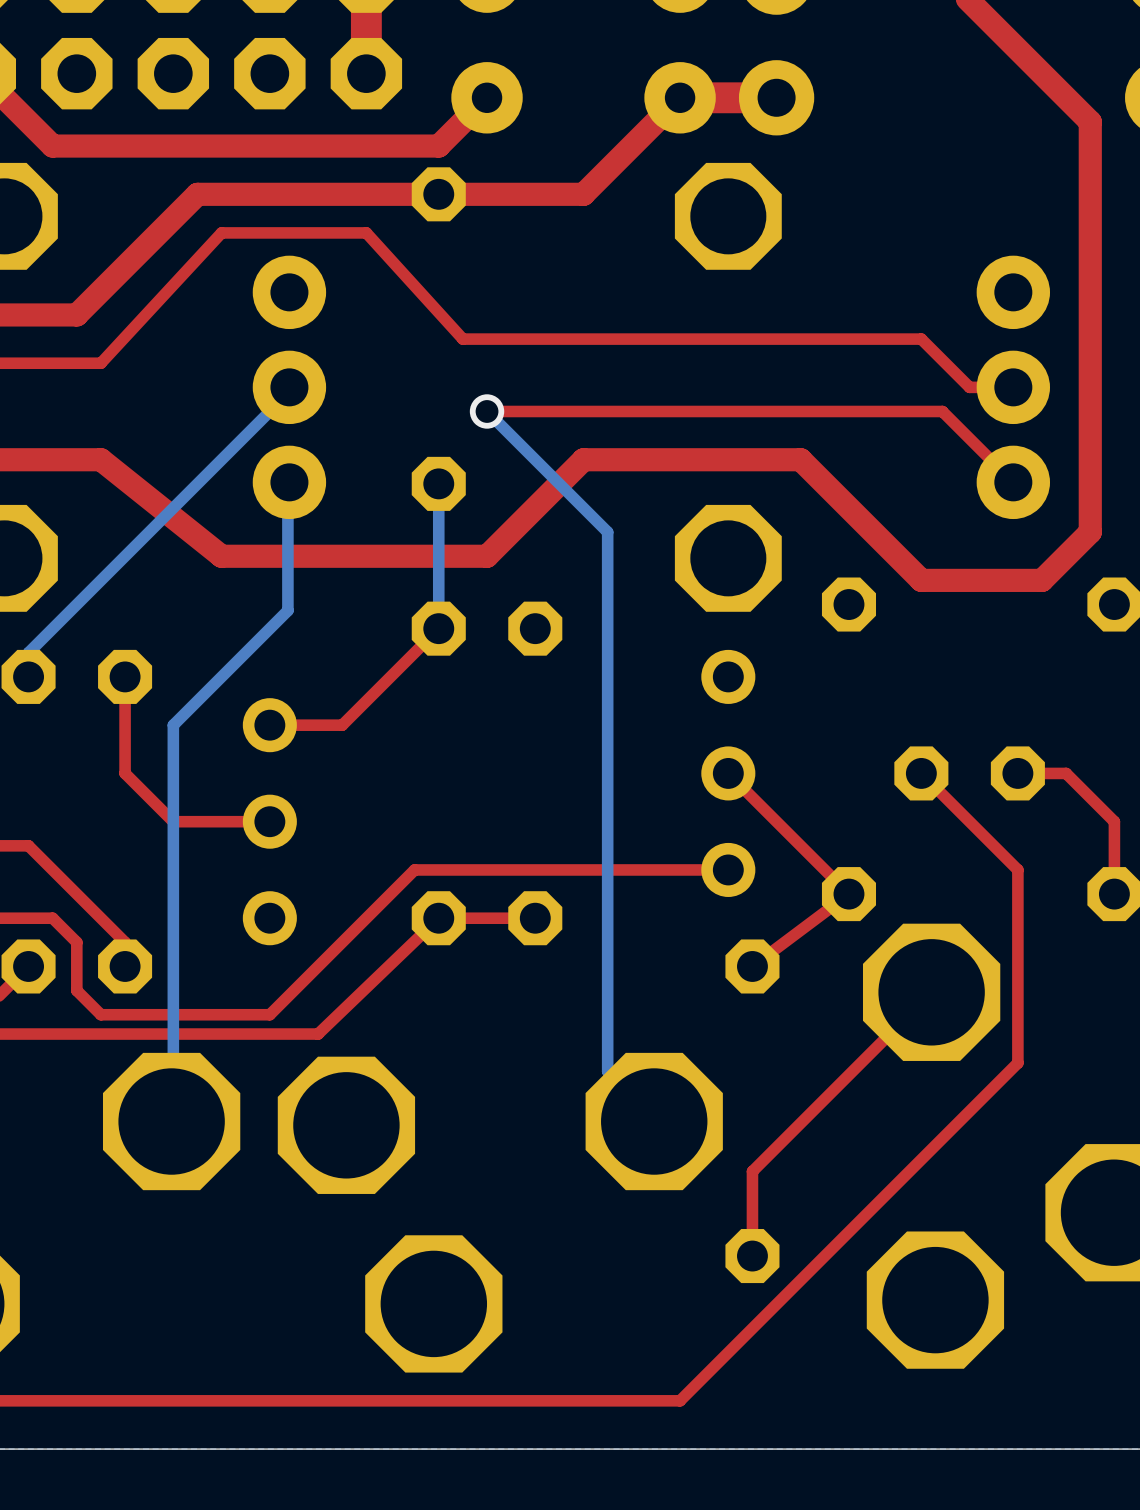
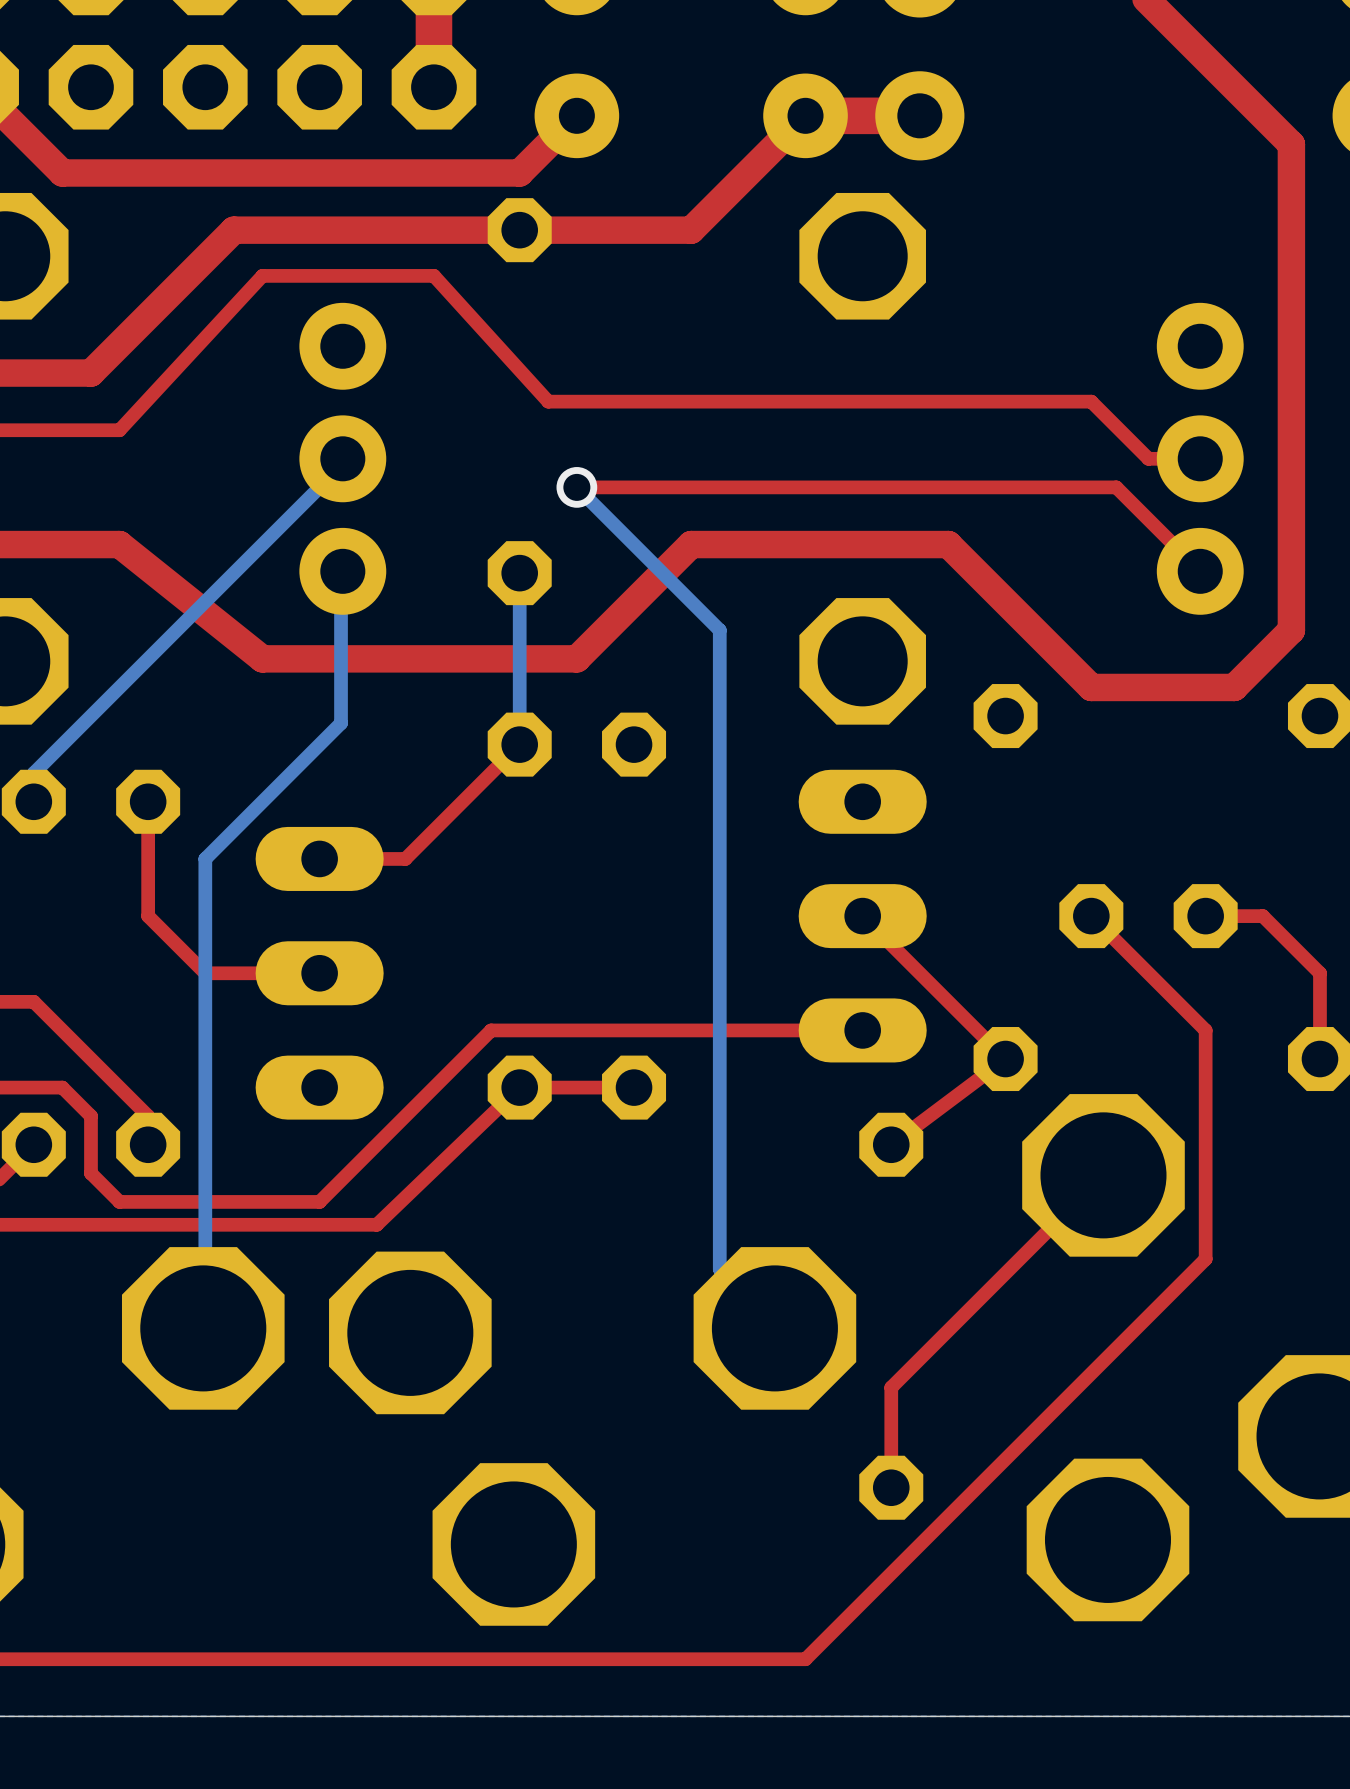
part footprint: [701, 649, 756, 897] -> [798, 769, 927, 1063]
part footprint: [242, 698, 297, 946] -> [255, 826, 384, 1120]

